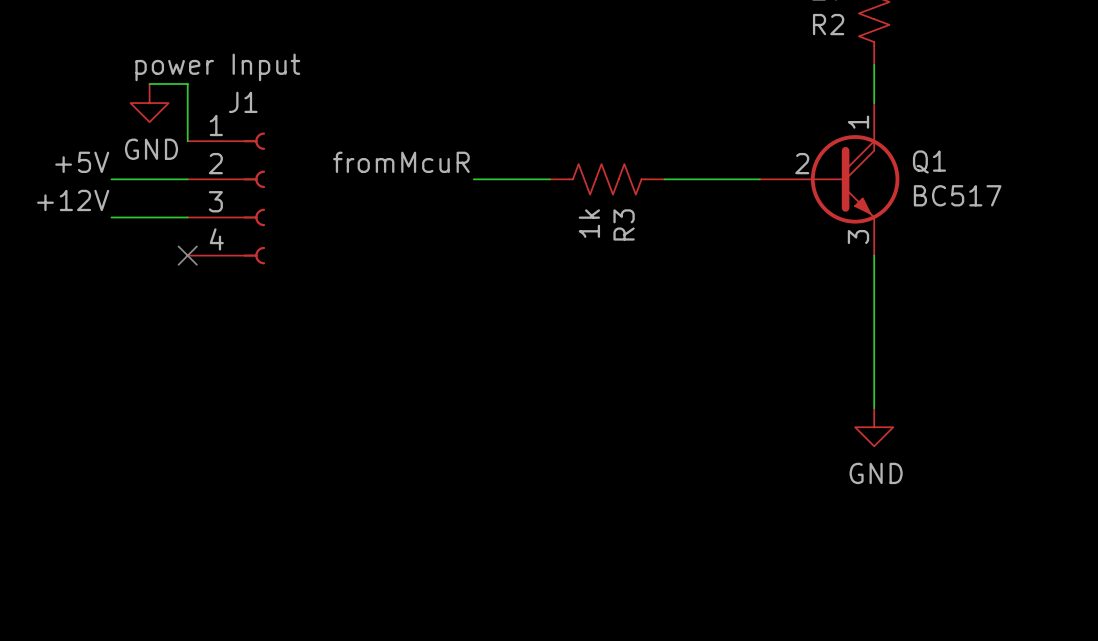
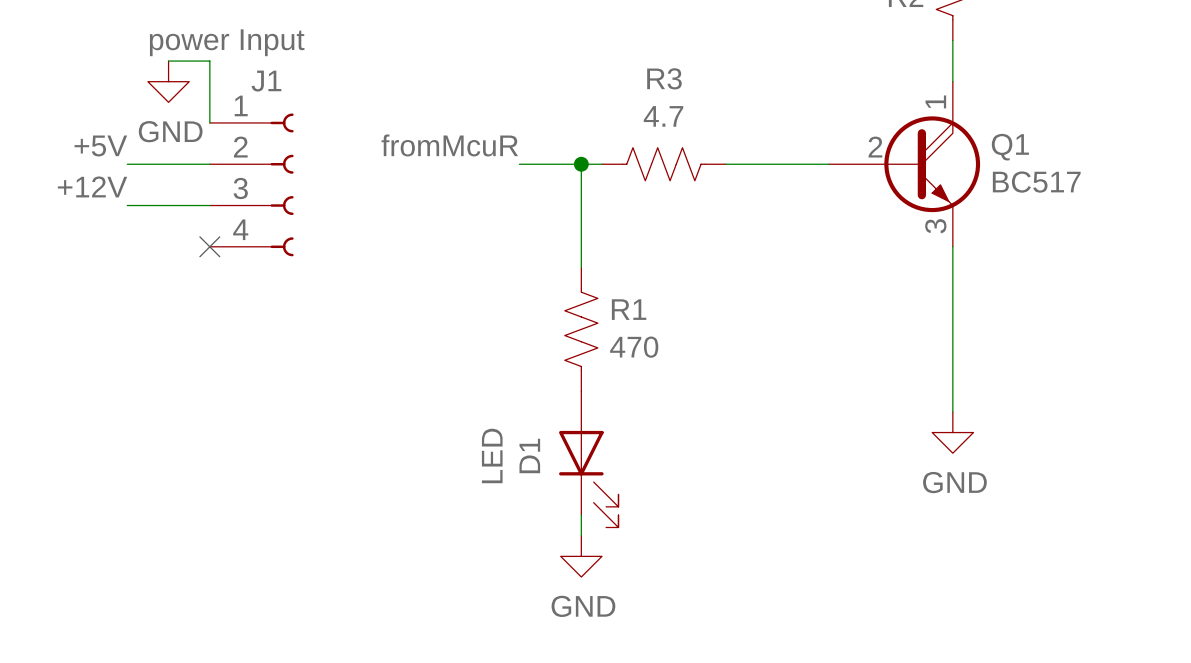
wire: none -> (581, 164) (581, 267)
junction: none -> (581, 164)
R3 value: 1k (589, 223) -> 4.7 (663, 116)
R3 name rotation: 0° (624, 224) -> 90° clockwise (664, 78)
R3 name position: R3 (624, 224) -> R3 (664, 78)
R1: none -> 470 (581, 329)
D1: none -> LED (588, 459)
wire: none -> (581, 515) (581, 535)
power symbol: none -> GND (581, 556)

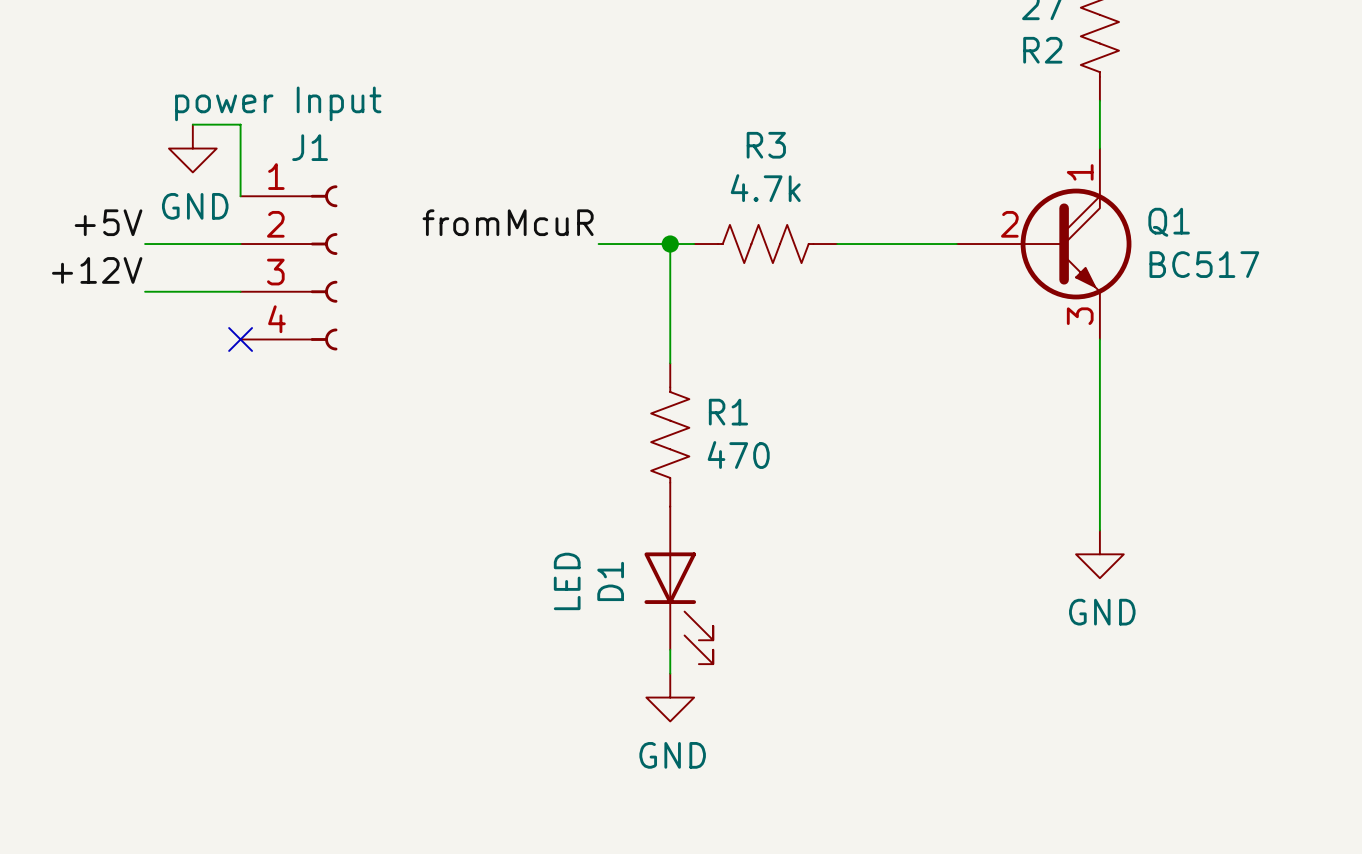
R3 value: 4.7 (663, 116) -> 4.7k (765, 188)

